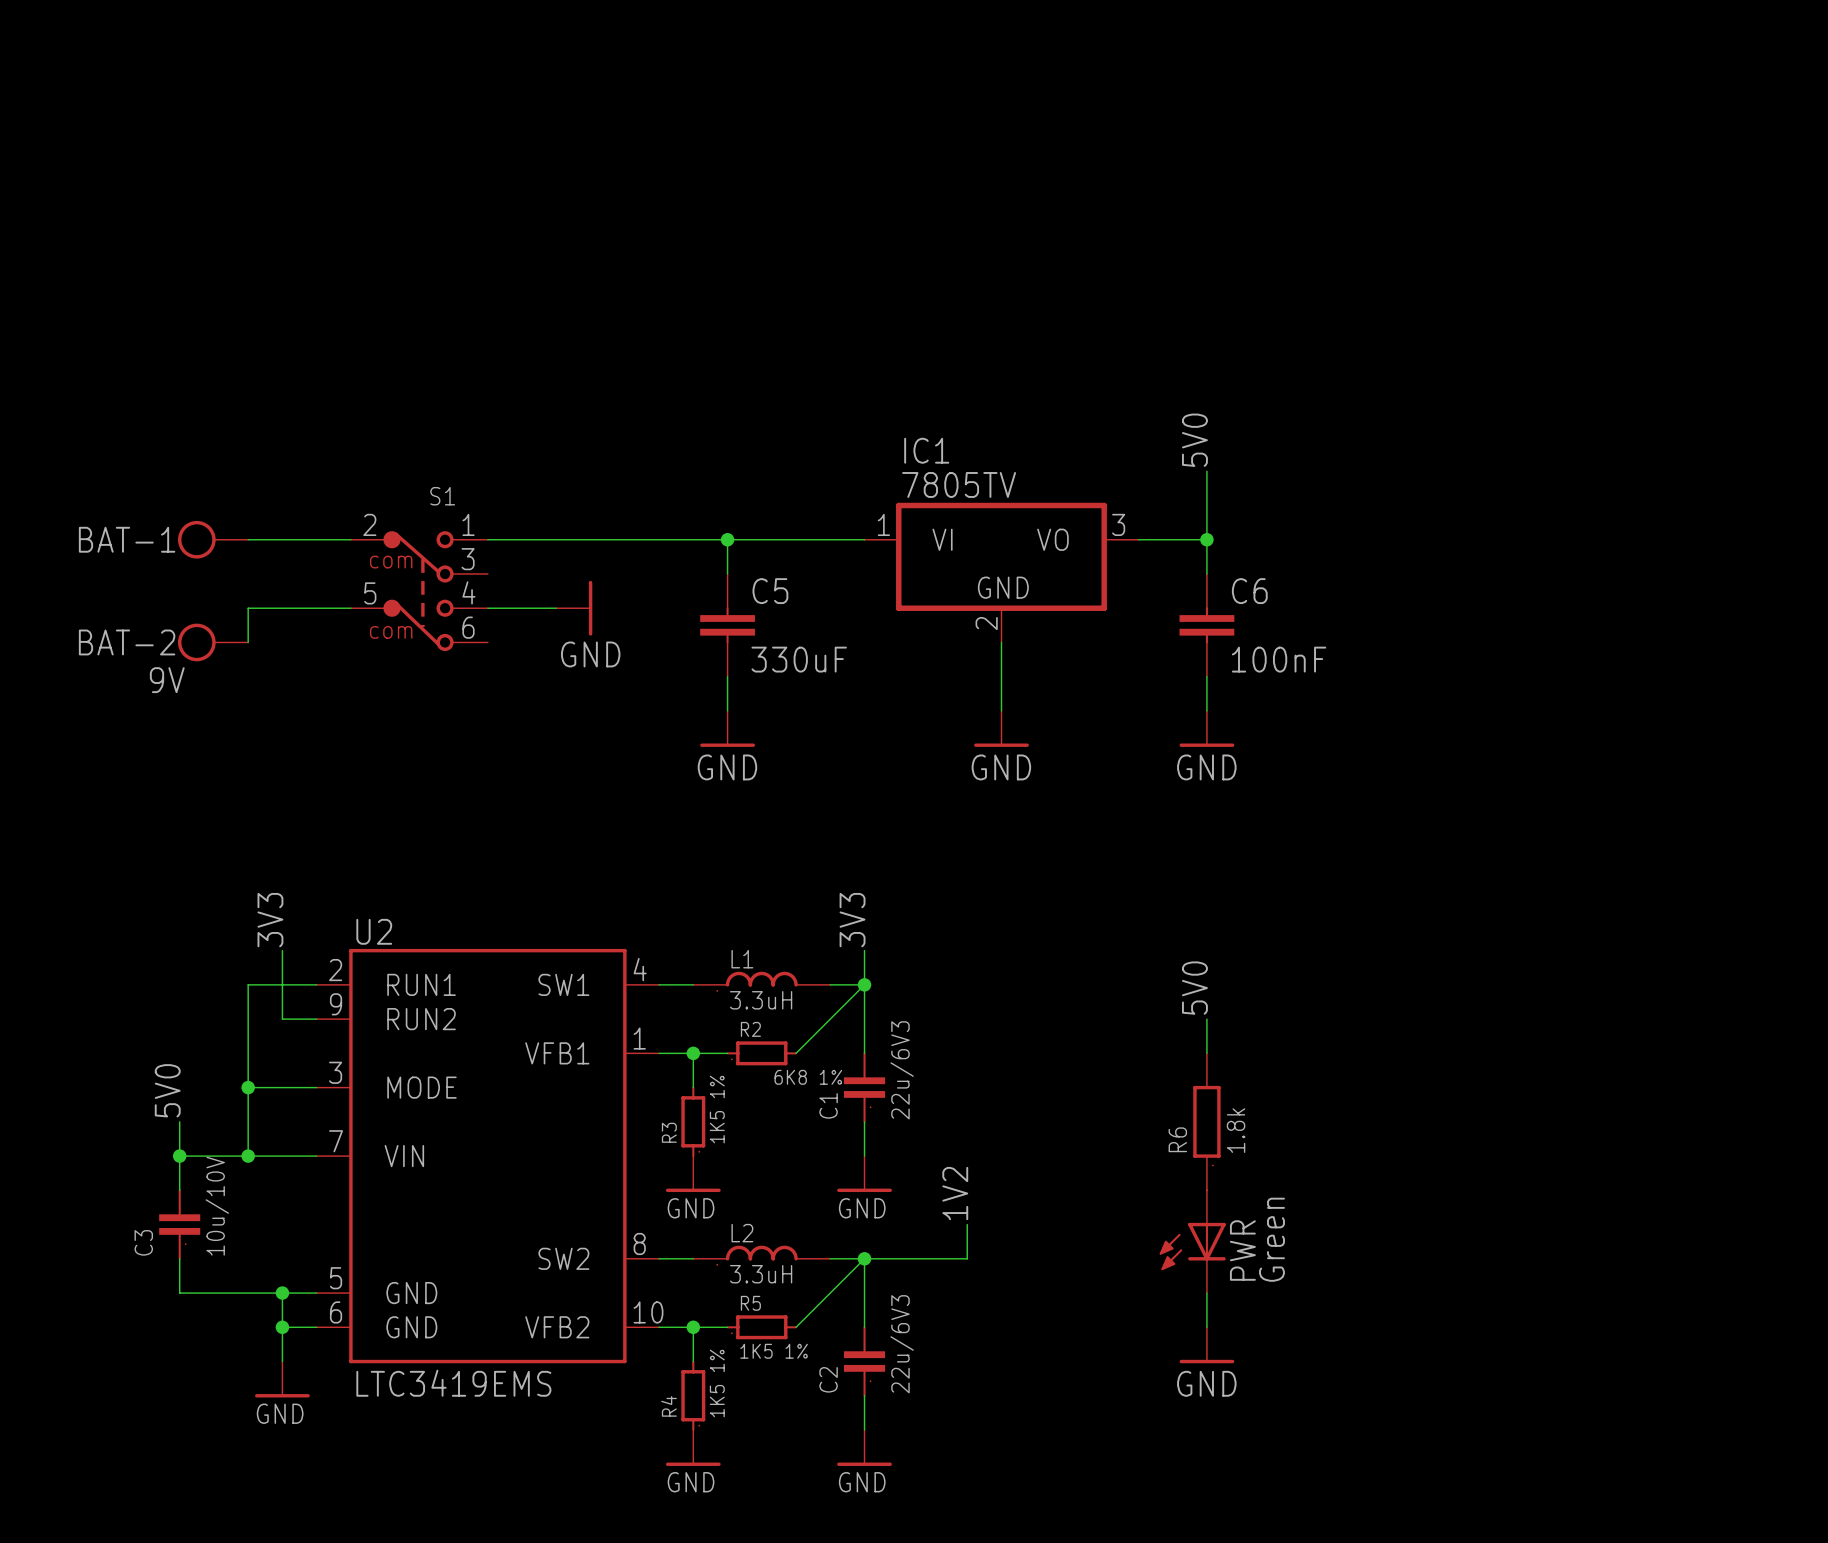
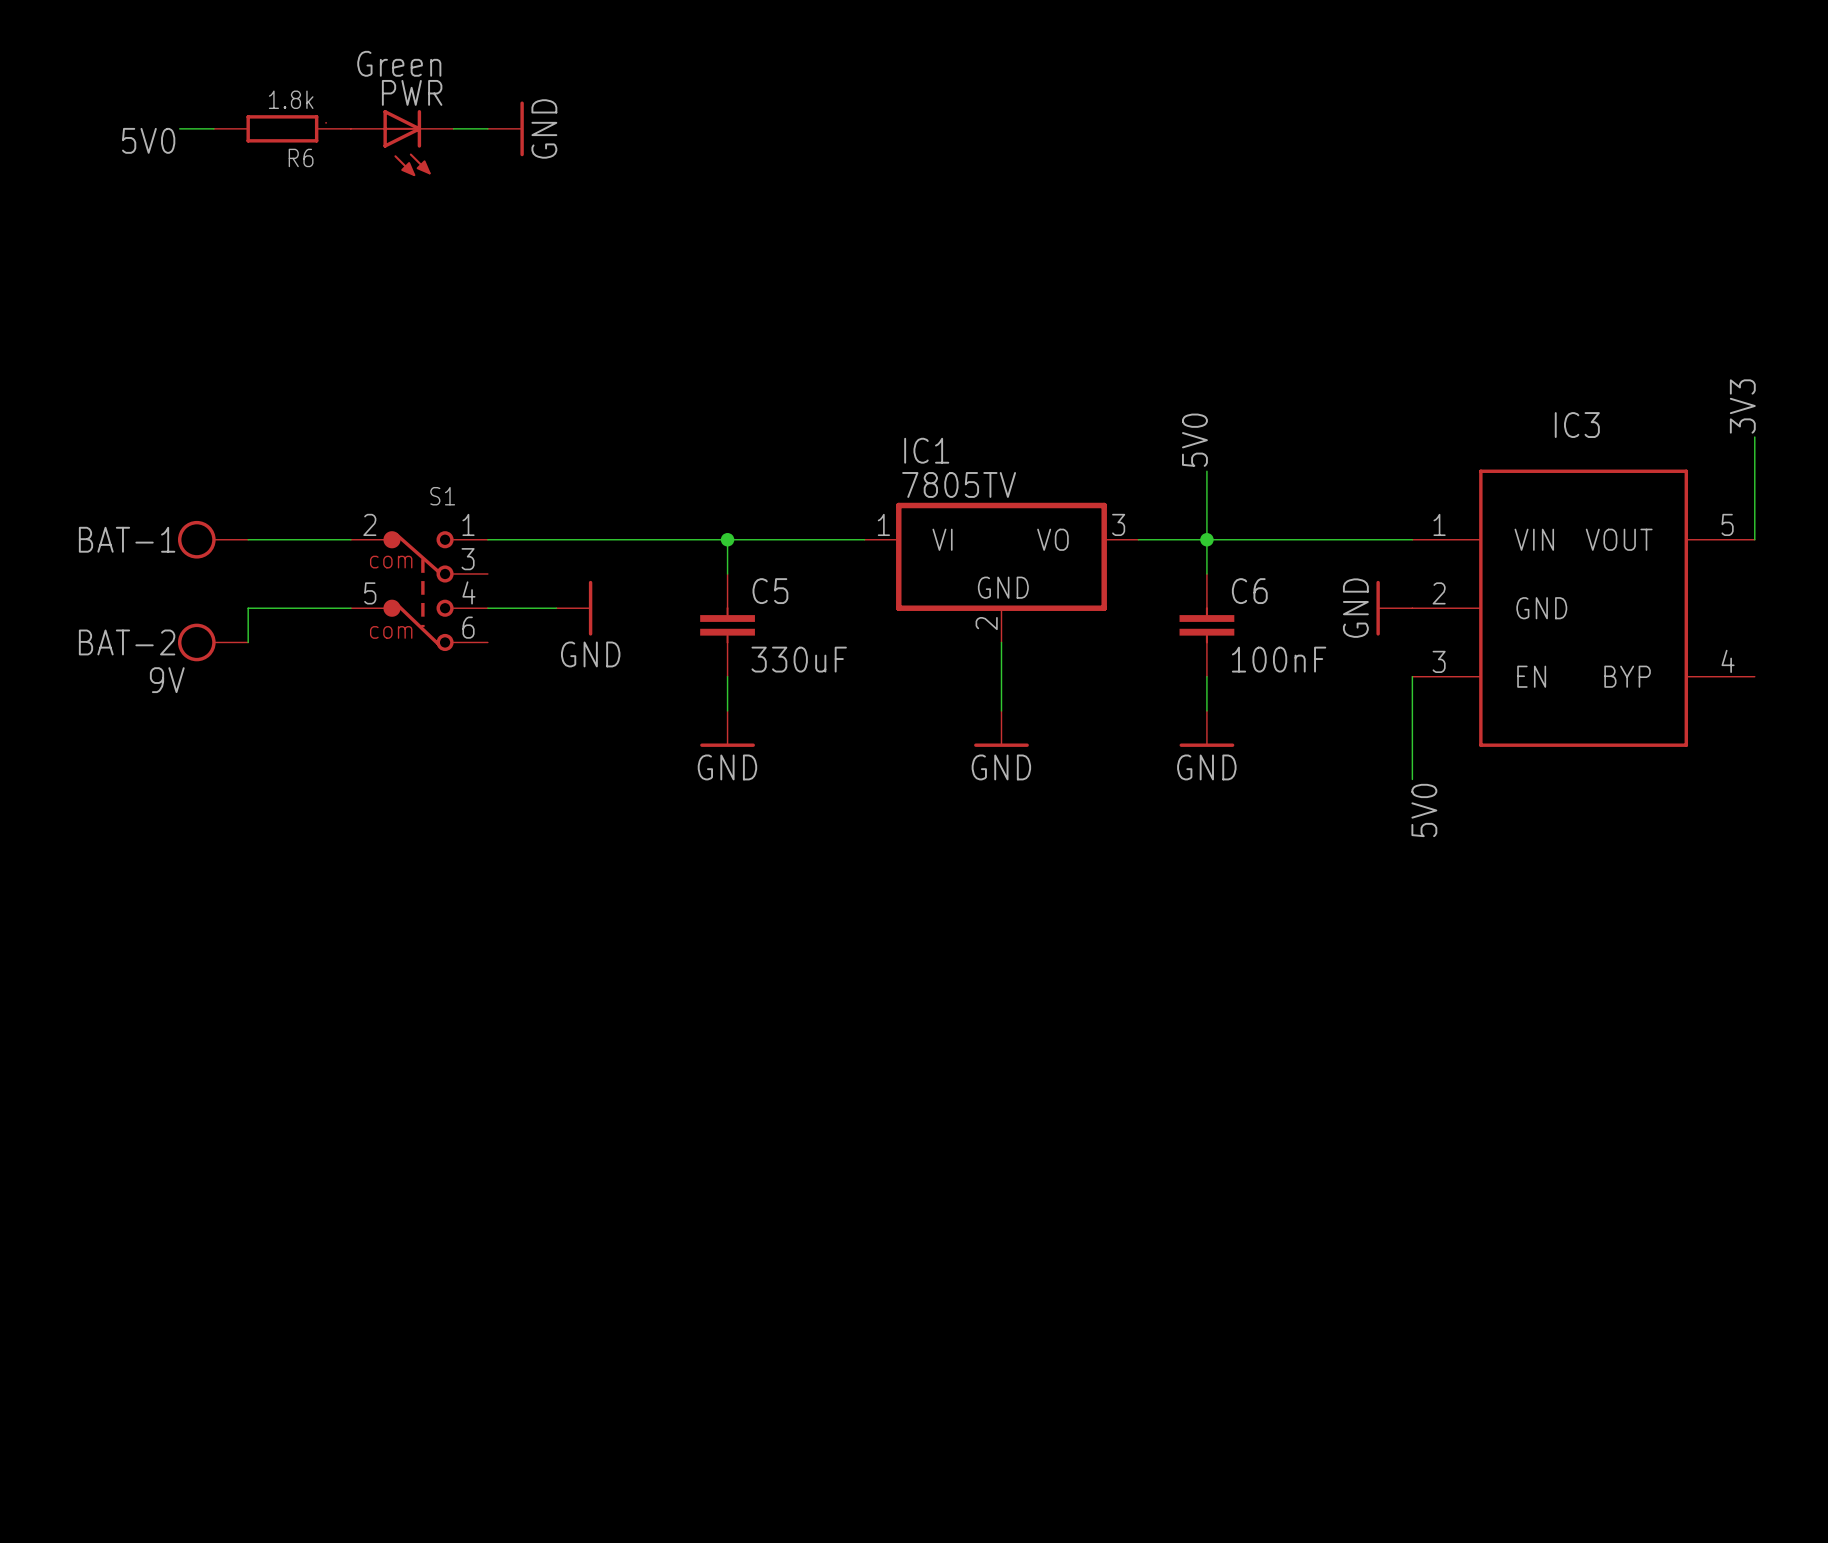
wire: none -> (179, 128) (213, 128)
wire: none -> (453, 128) (487, 128)
power symbol: none -> GND (505, 128)
label: none -> 5V0 (148, 140)
PWR: none -> Green (402, 143)
label: none -> 3V3 (1742, 406)
wire: none -> (1754, 437) (1754, 539)
wire: none -> (1206, 539) (1412, 539)
power symbol: none -> GND (1394, 608)
IC3: none -> (1583, 608)
wire: none -> (1412, 676) (1412, 779)
label: 3V3 (270, 920) -> none
label: 3V3 (852, 920) -> none
wire: (282, 950) (282, 1019) (316, 1019) -> none
wire: (864, 950) (864, 1053) -> none
L1: 3.3uH (761, 981) -> none
wire: (316, 984) (248, 984) (248, 1156) -> none
wire: (659, 984) (693, 984) -> none
wire: (830, 984) (864, 984) (796, 1053) -> none
junction: (864, 984) -> none
label position: 5V0 (1194, 988) -> 5V0 (1424, 810)
wire: (1206, 1019) (1206, 1053) -> none
wire: (659, 1053) (727, 1053) -> none
wire: (693, 1053) (693, 1087) -> none
junction: (693, 1053) -> none
R2: 6K8 1% (761, 1053) -> none
wire: (248, 1087) (316, 1087) -> none
junction: (248, 1087) -> none
C1: 22u/6V3 (864, 1087) -> none
label: 5V0 (167, 1090) -> none
wire: (179, 1121) (179, 1190) -> none
R3: 1K5 1% (693, 1121) -> none
wire: (864, 1121) (864, 1156) -> none
R6 position: (1206, 1121) -> (282, 128)
R6 rotation: 0° (1206, 1126) -> 90° counterclockwise (286, 128)
wire: (179, 1156) (316, 1156) -> none
junction: (179, 1156) -> none
junction: (248, 1156) -> none
U2: LTC3419EMS (487, 1156) -> none
power symbol: GND (693, 1174) -> none
power symbol: GND (864, 1174) -> none
label: 1V2 (955, 1193) -> none
C3: 10u/10V (179, 1224) -> none
wire: (967, 1224) (967, 1258) (830, 1258) -> none
PWR: Green (1192, 1241) -> none
L2: 3.3uH (761, 1255) -> none
wire: (179, 1258) (179, 1293) (316, 1293) -> none
wire: (659, 1258) (693, 1258) -> none
junction: (864, 1258) -> none
wire: (282, 1293) (282, 1361) -> none
junction: (282, 1293) -> none
wire: (1206, 1293) (1206, 1327) -> none
wire: (282, 1327) (316, 1327) -> none
junction: (282, 1327) -> none
wire: (659, 1327) (727, 1327) -> none
wire: (693, 1327) (693, 1361) -> none
junction: (693, 1327) -> none
R5: 1K5 1% (761, 1327) -> none
wire: (796, 1327) (864, 1258) (864, 1327) -> none
power symbol: GND (1206, 1345) -> none
C2: 22u/6V3 (864, 1361) -> none
power symbol: GND (282, 1379) -> none
R4: 1K5 1% (693, 1395) -> none
wire: (864, 1395) (864, 1430) -> none
power symbol: GND (693, 1447) -> none
power symbol: GND (864, 1447) -> none

